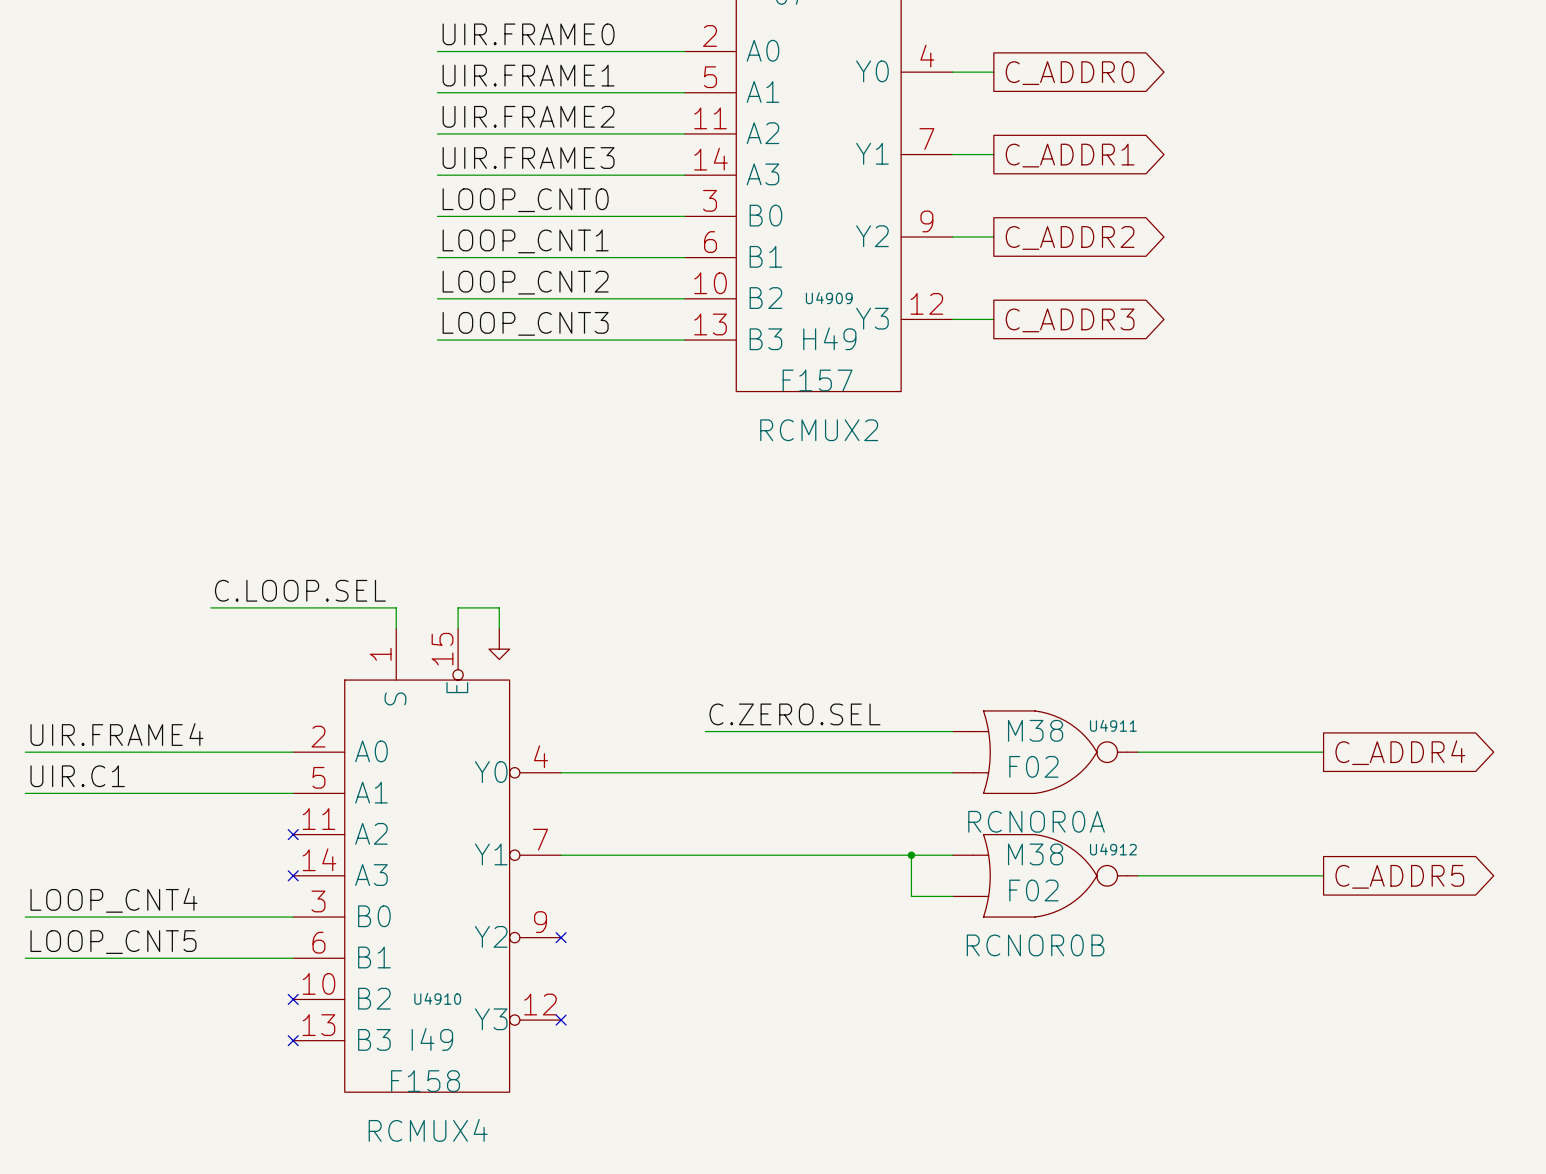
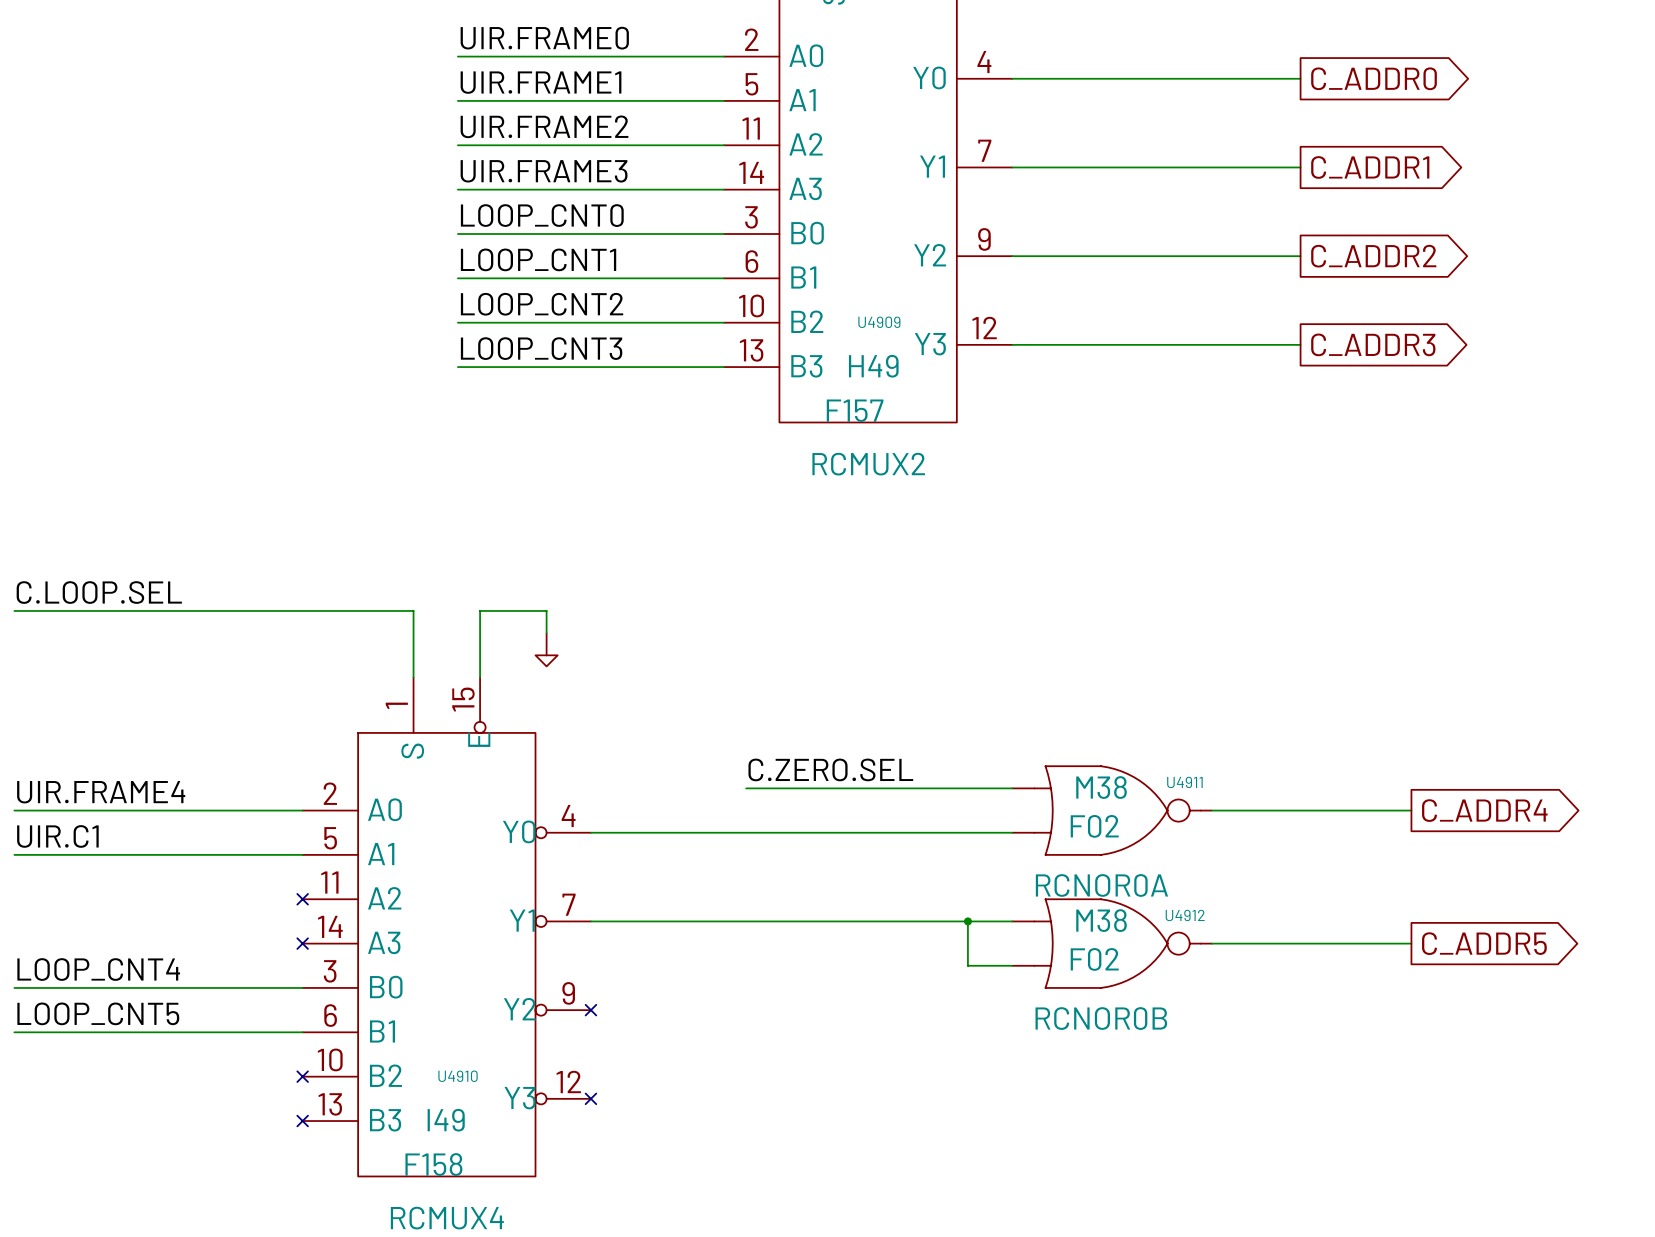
wire: none -> (1056, 78) (1300, 78)
global label: C_ADDR0 (1070, 73) -> none
global label: none -> C_ADDR0 (1374, 78)
wire: none -> (1056, 167) (1300, 167)
global label: C_ADDR1 (1070, 155) -> none
global label: none -> C_ADDR1 (1370, 167)
wire: none -> (1056, 256) (1300, 256)
global label: C_ADDR2 (1070, 237) -> none
global label: none -> C_ADDR2 (1373, 256)
wire: none -> (1056, 344) (1300, 344)
global label: C_ADDR3 (1070, 320) -> none
global label: none -> C_ADDR3 (1373, 344)
label position: C.LOOP.SEL (300, 590) -> C.LOOP.SEL (99, 592)
wire: (210, 607) (396, 607) -> (14, 610) (413, 610) (413, 655)
wire: (458, 607) (499, 607) (499, 628) -> (480, 655) (480, 610) (546, 610) (546, 633)
power symbol position: (499, 644) -> (546, 650)

